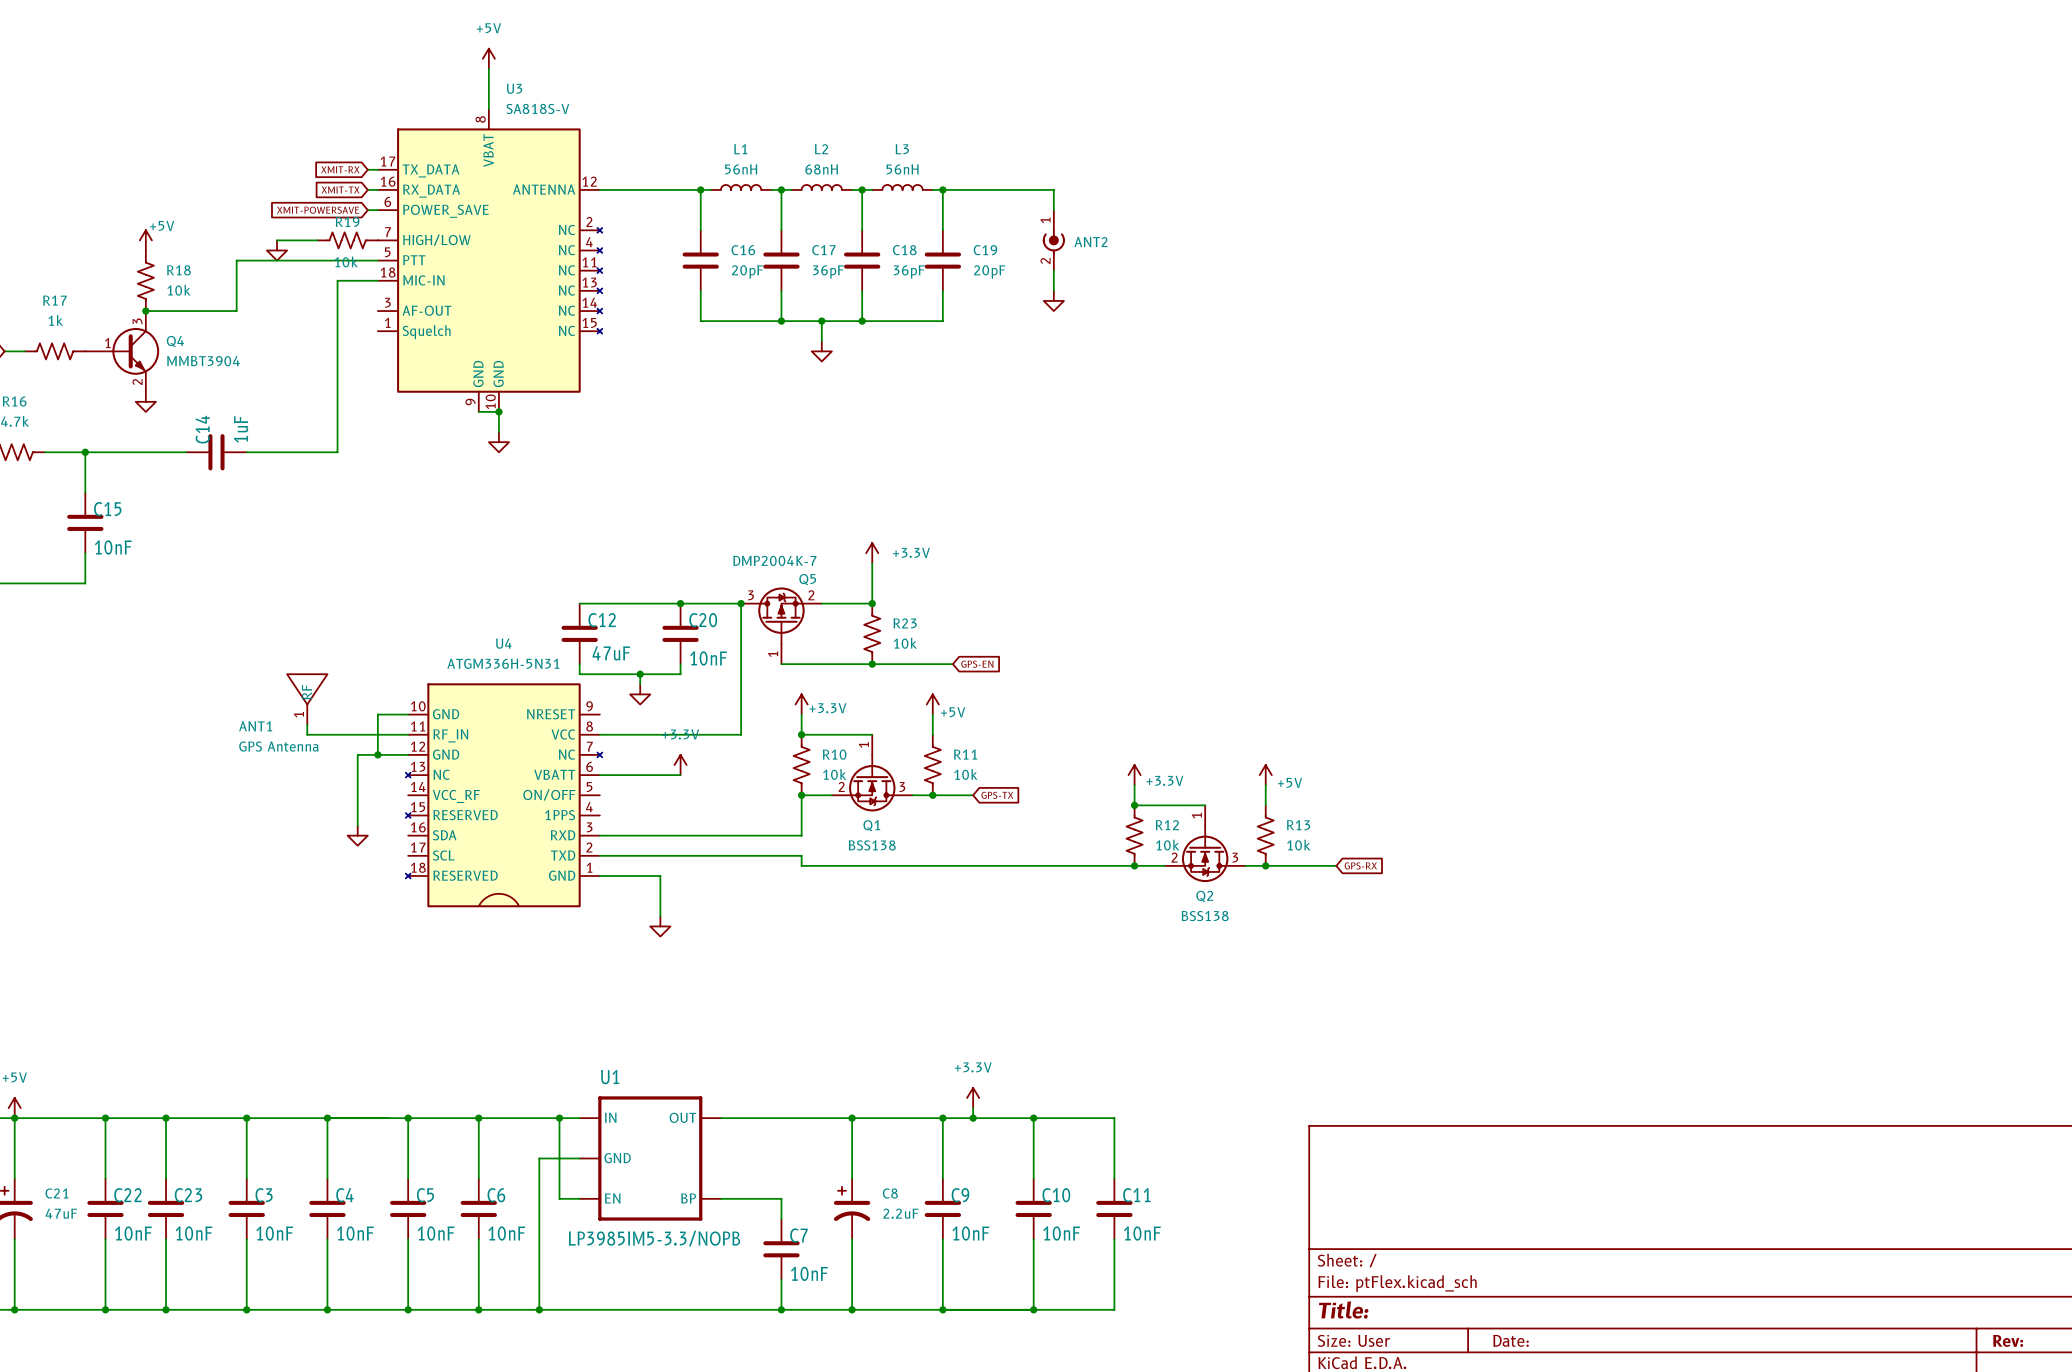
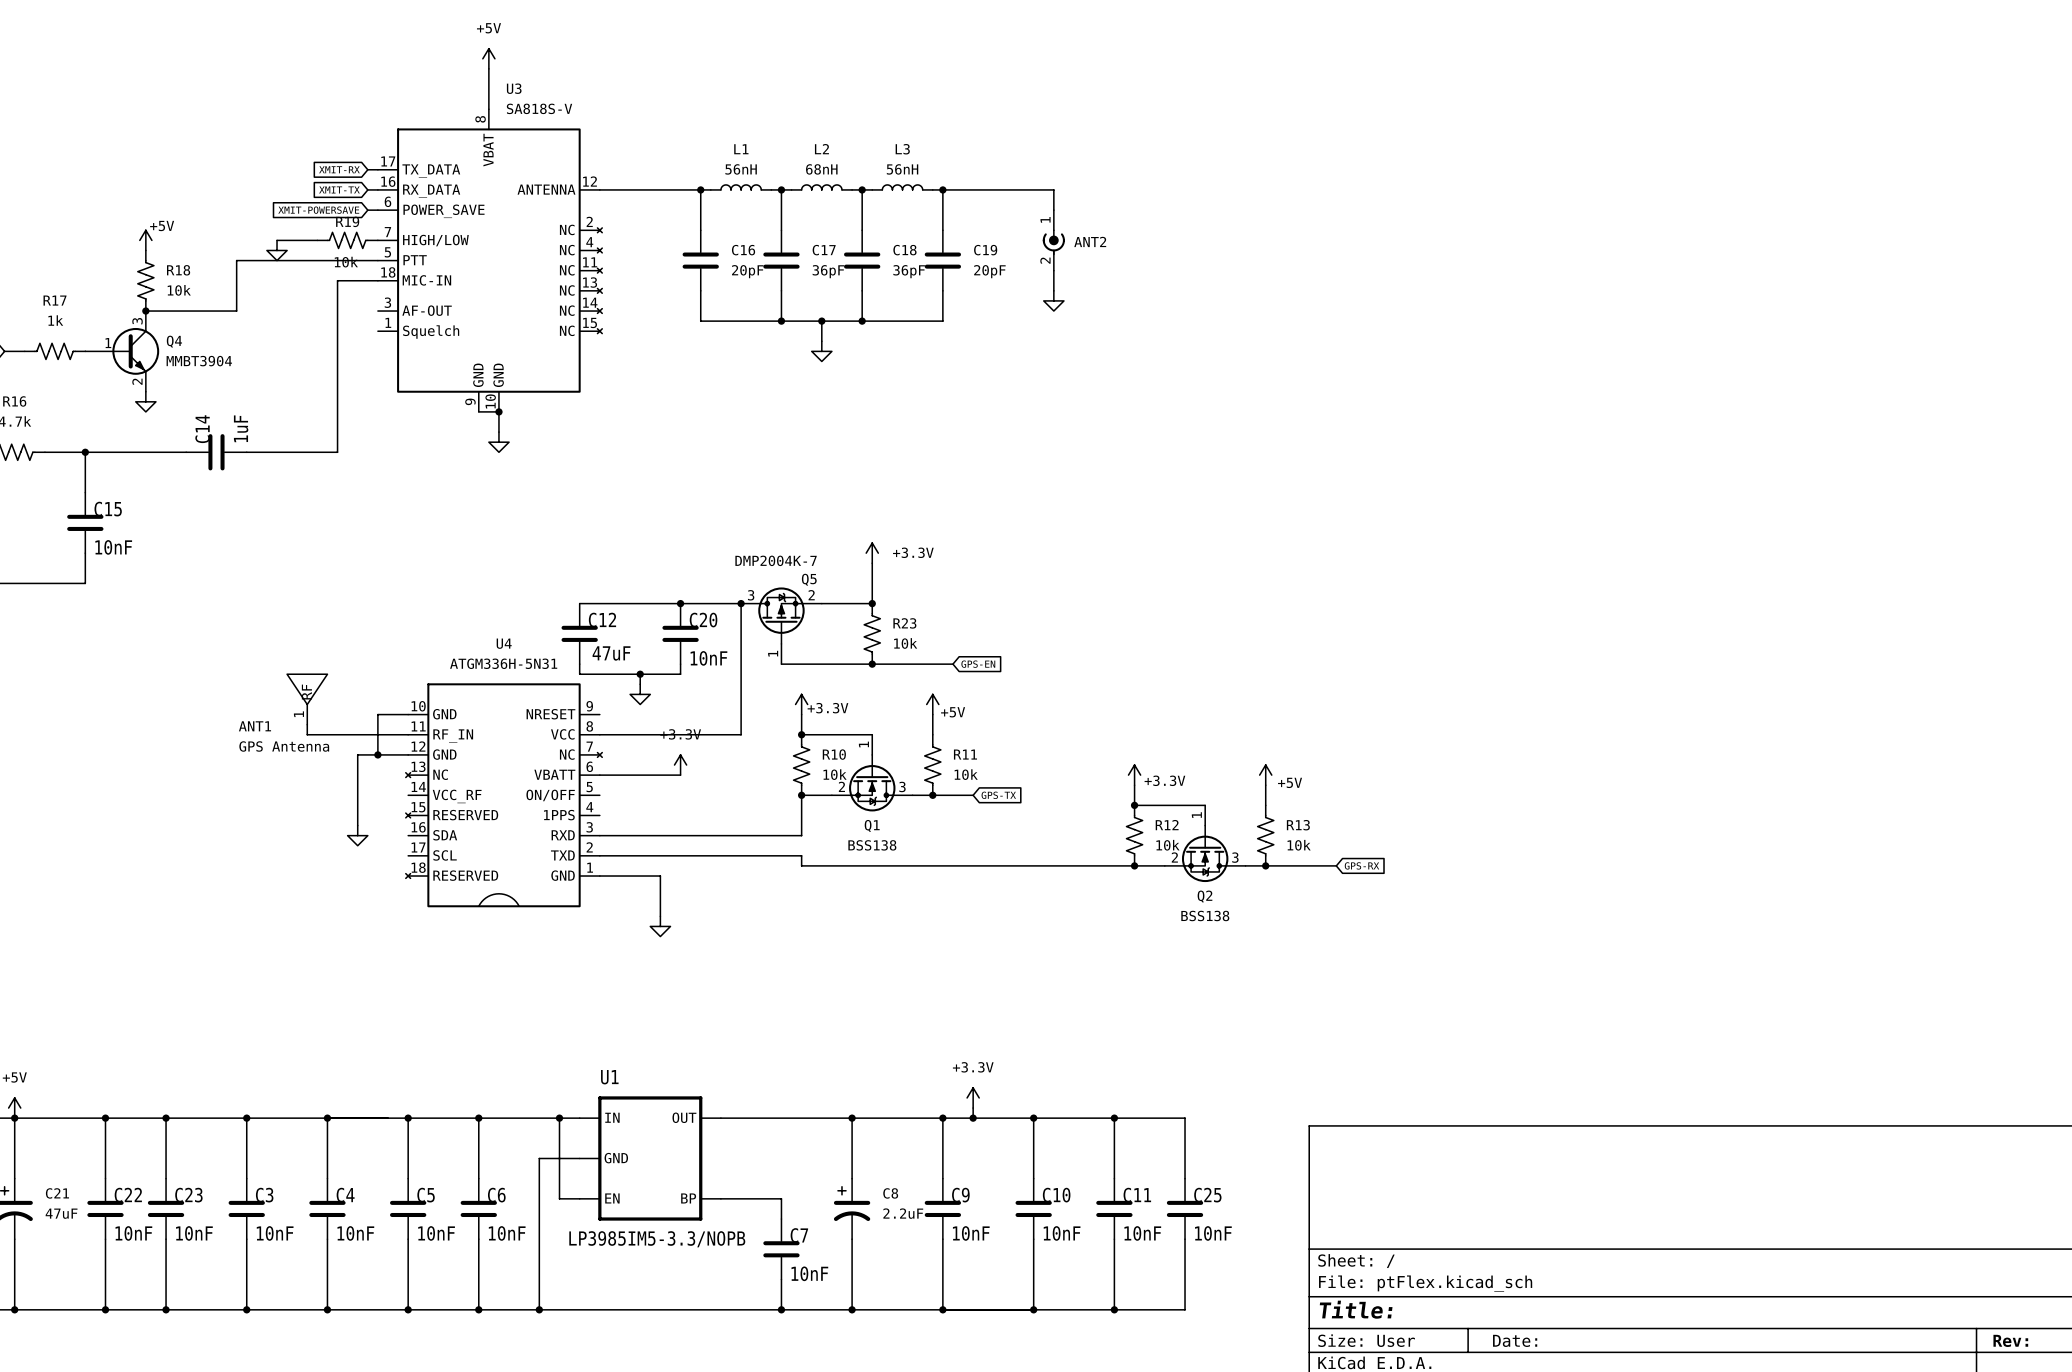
wire: none -> (1114, 1118) (1185, 1118) (1185, 1178)
junction: none -> (1114, 1118)
C25: none -> 10nF (1185, 1208)
wire: none -> (1185, 1239) (1185, 1309) (1114, 1309)
junction: none -> (1114, 1309)

